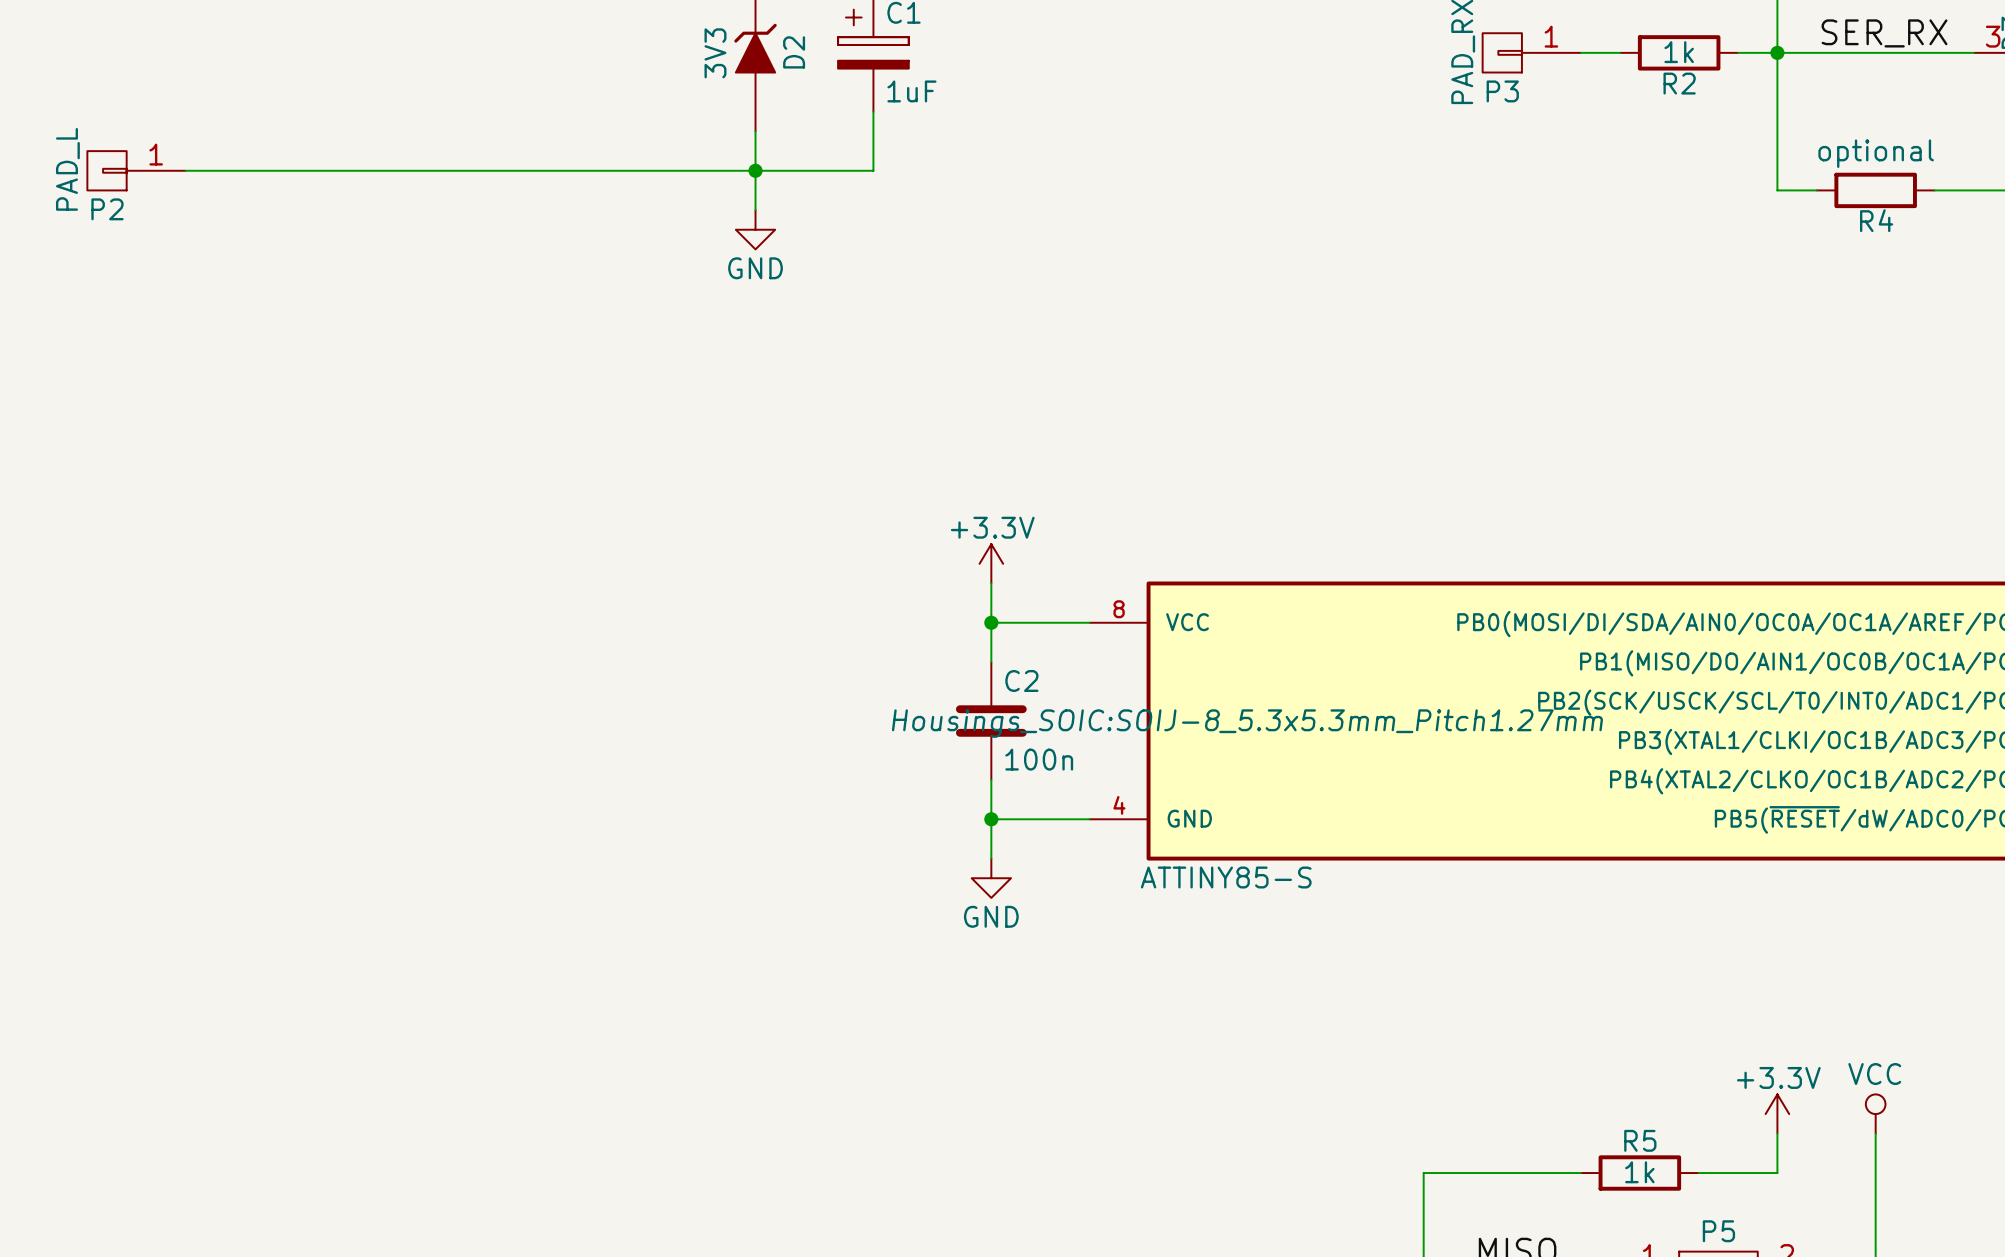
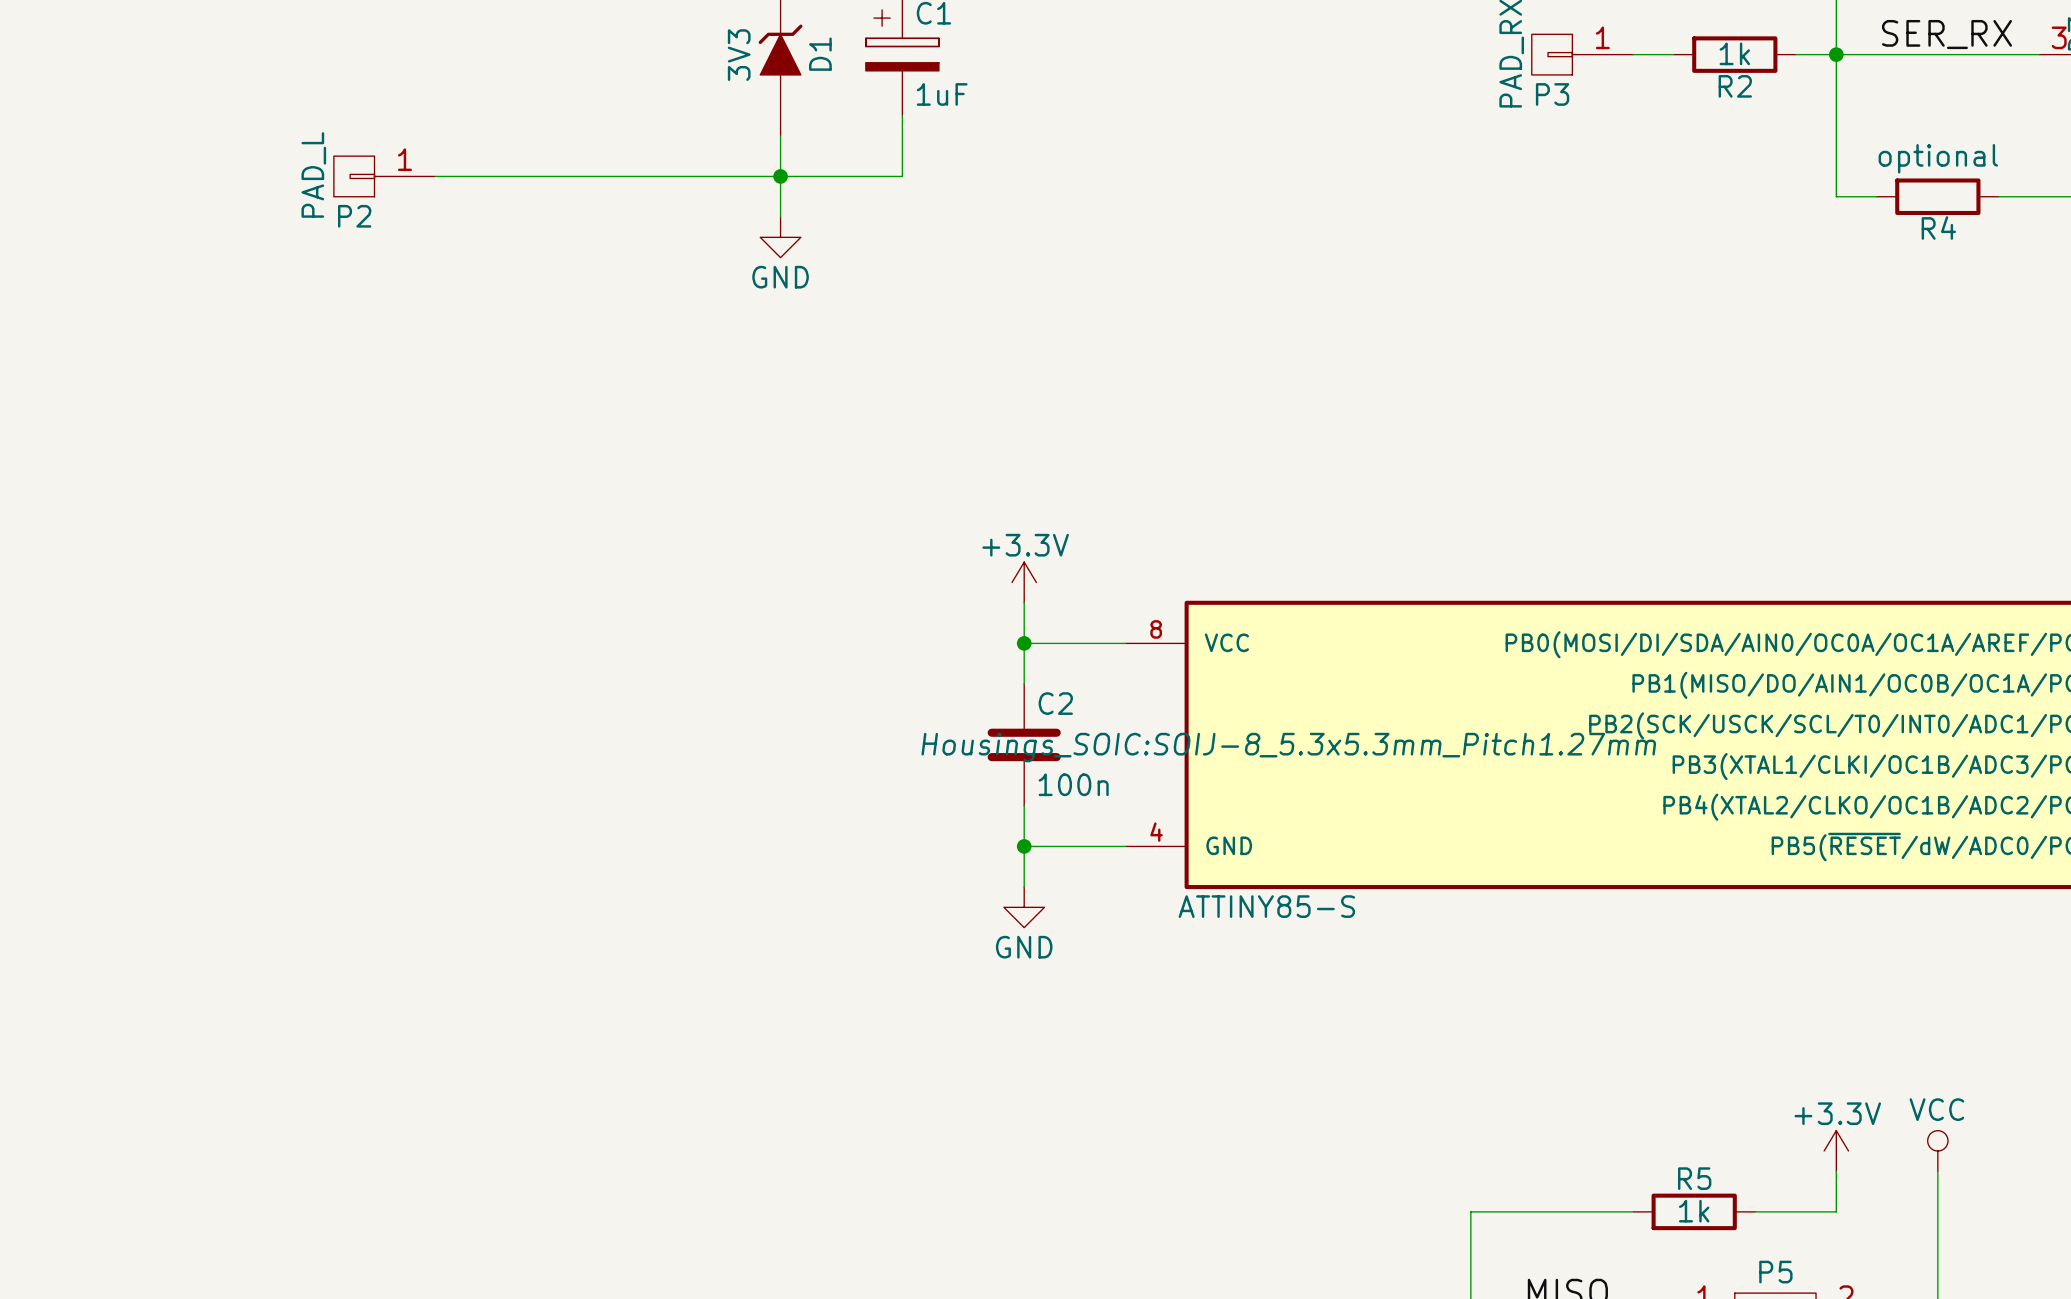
D2 name: D2 (794, 52) -> D1 (820, 54)
P2 position: (136, 170) -> (384, 176)
wire: (185, 170) (421, 170) -> none

